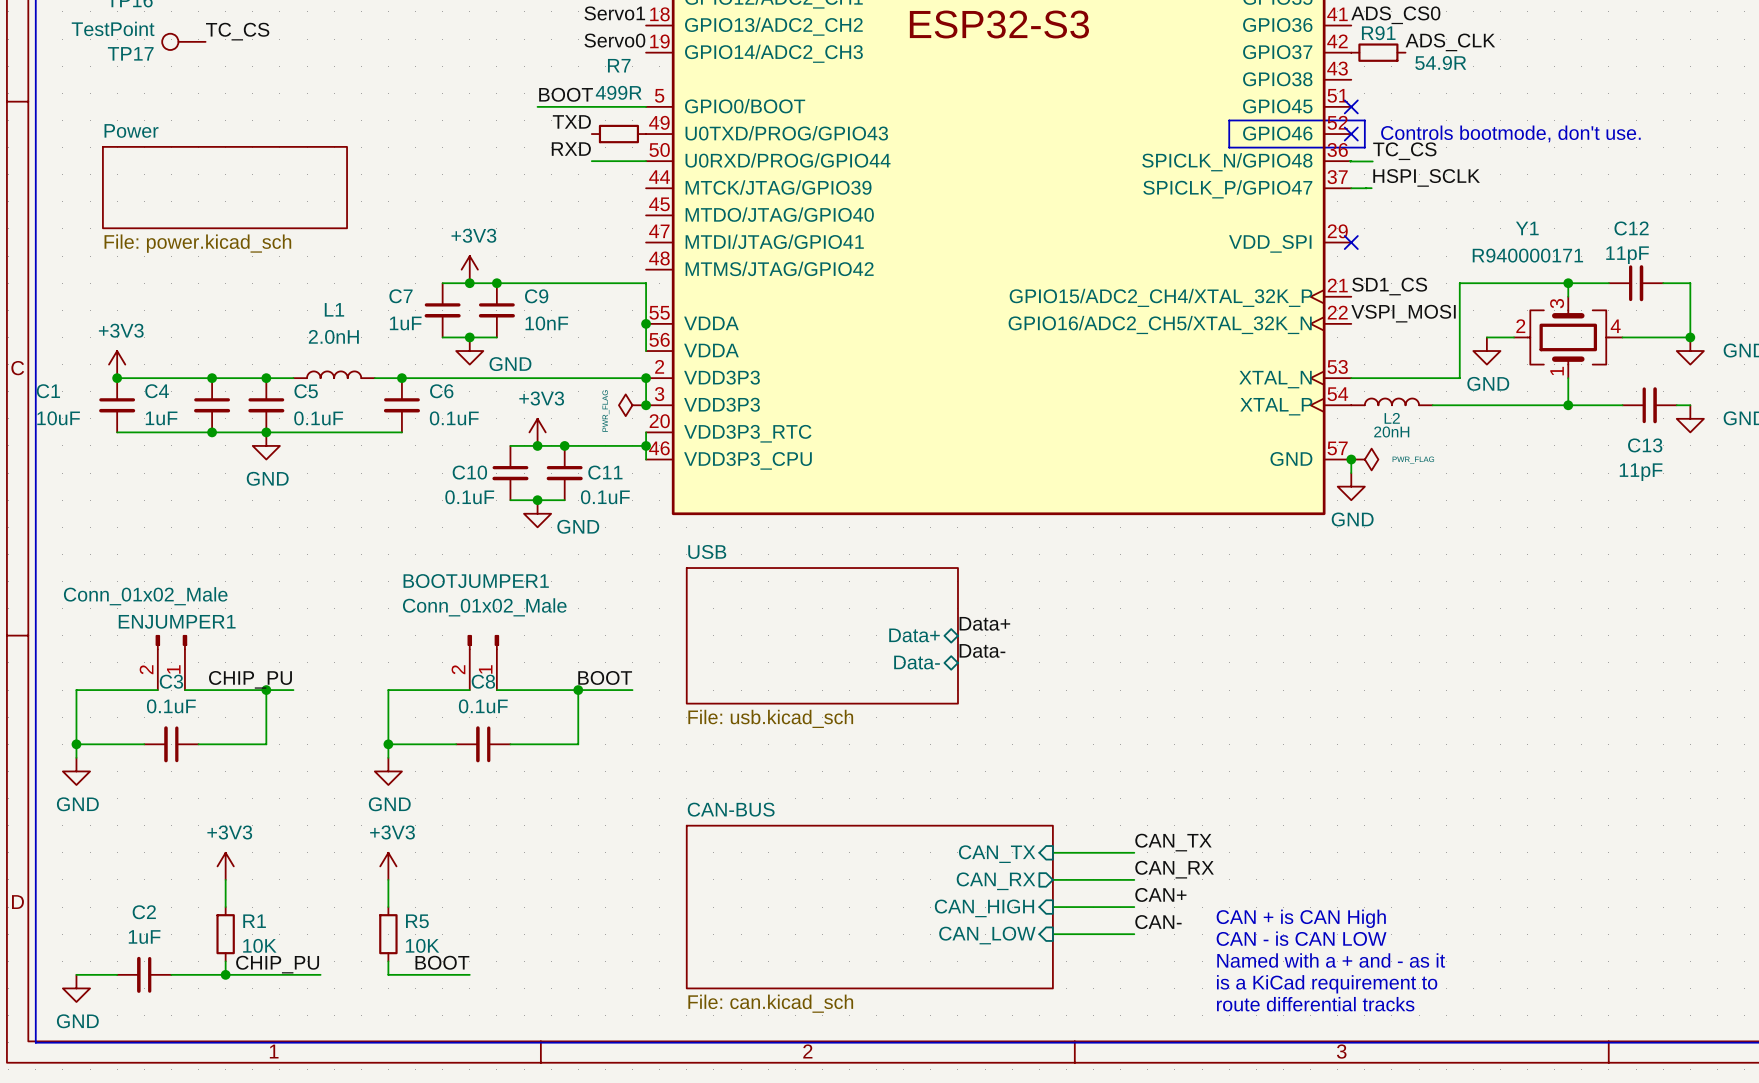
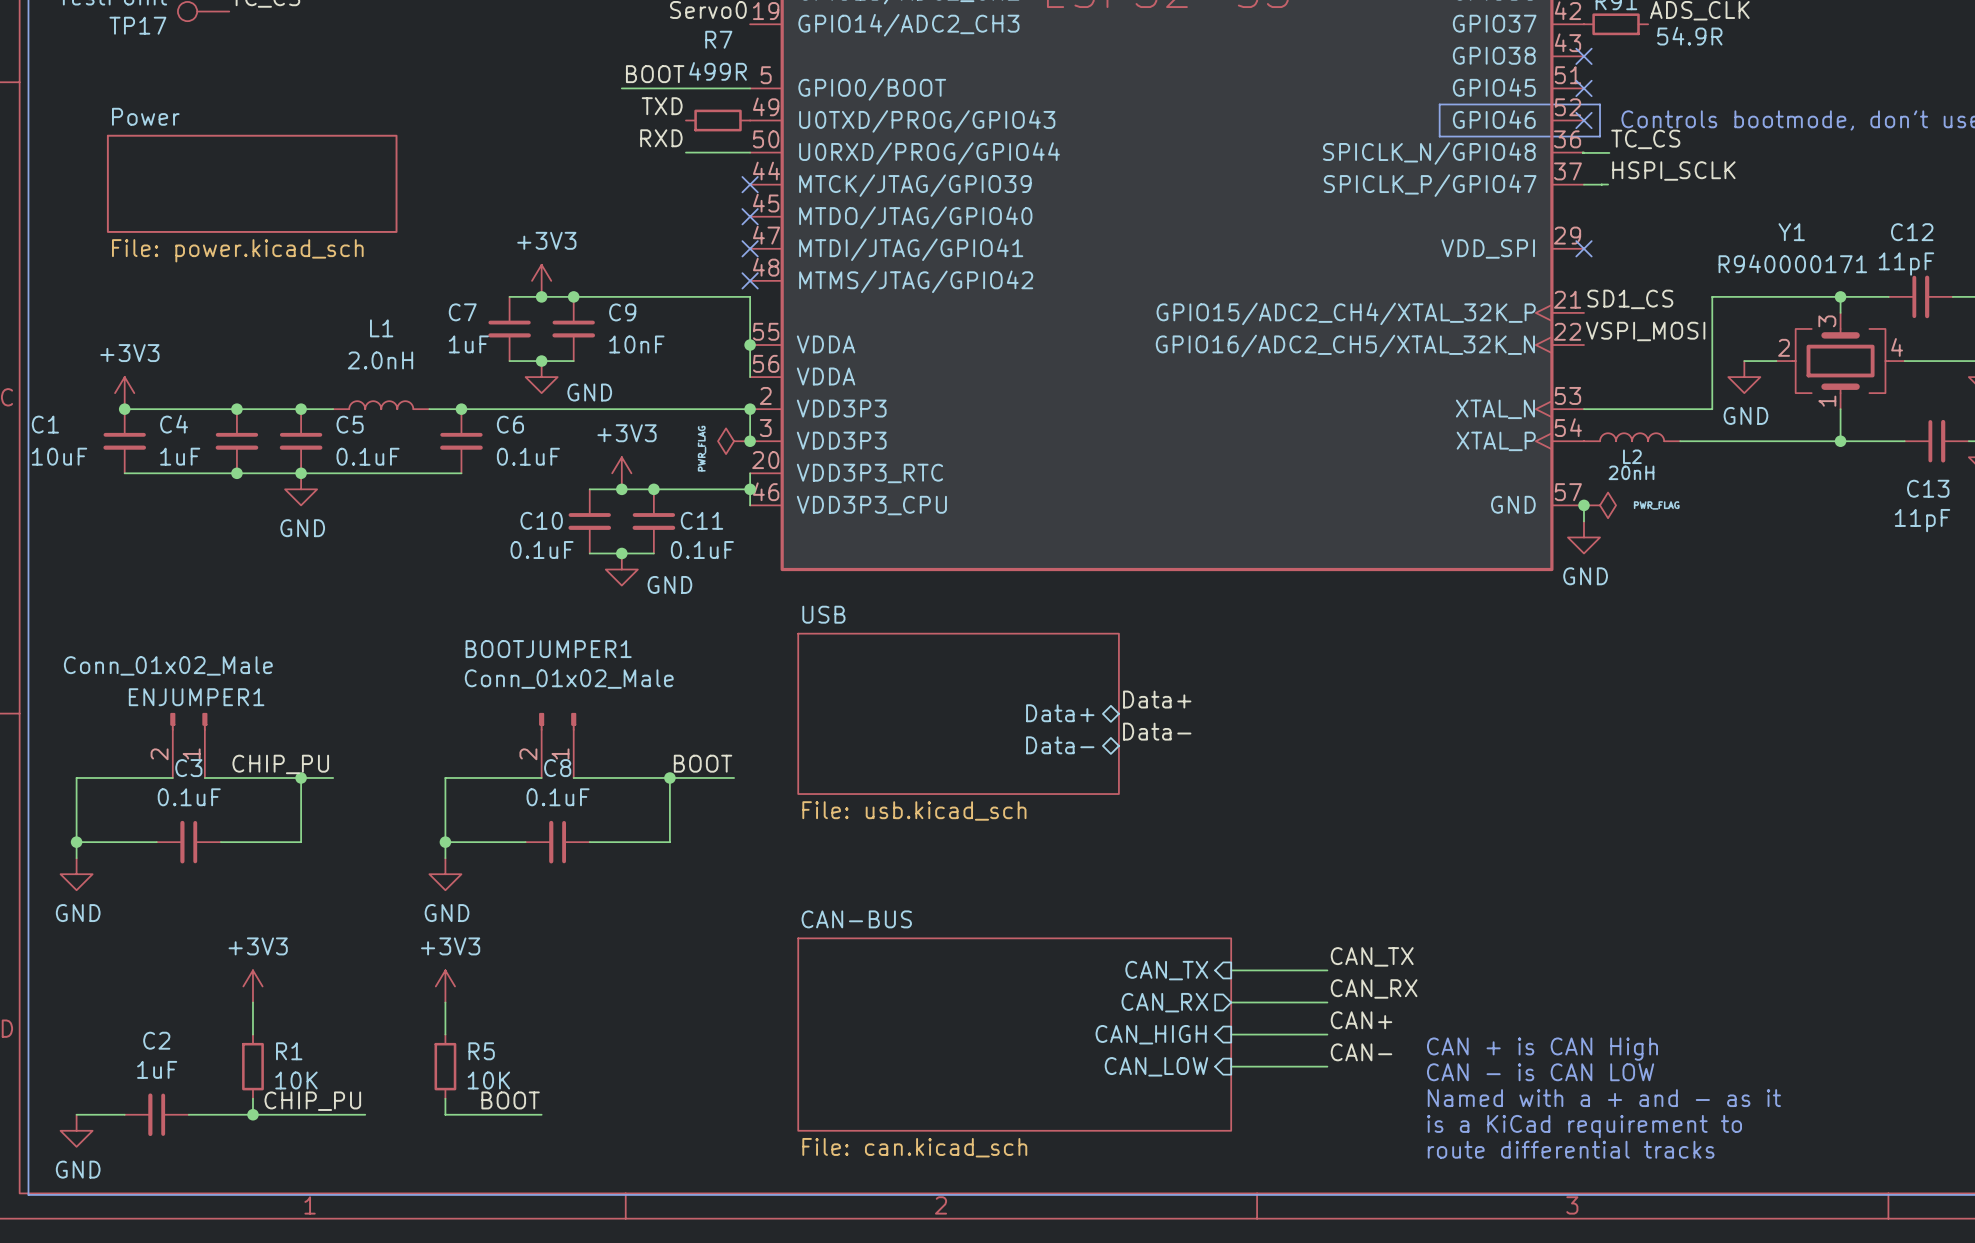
no-connect mark: none -> (1583, 56)
no-connect mark: none -> (750, 184)
no-connect mark: none -> (750, 216)
no-connect mark: none -> (750, 248)
no-connect mark: none -> (750, 280)

